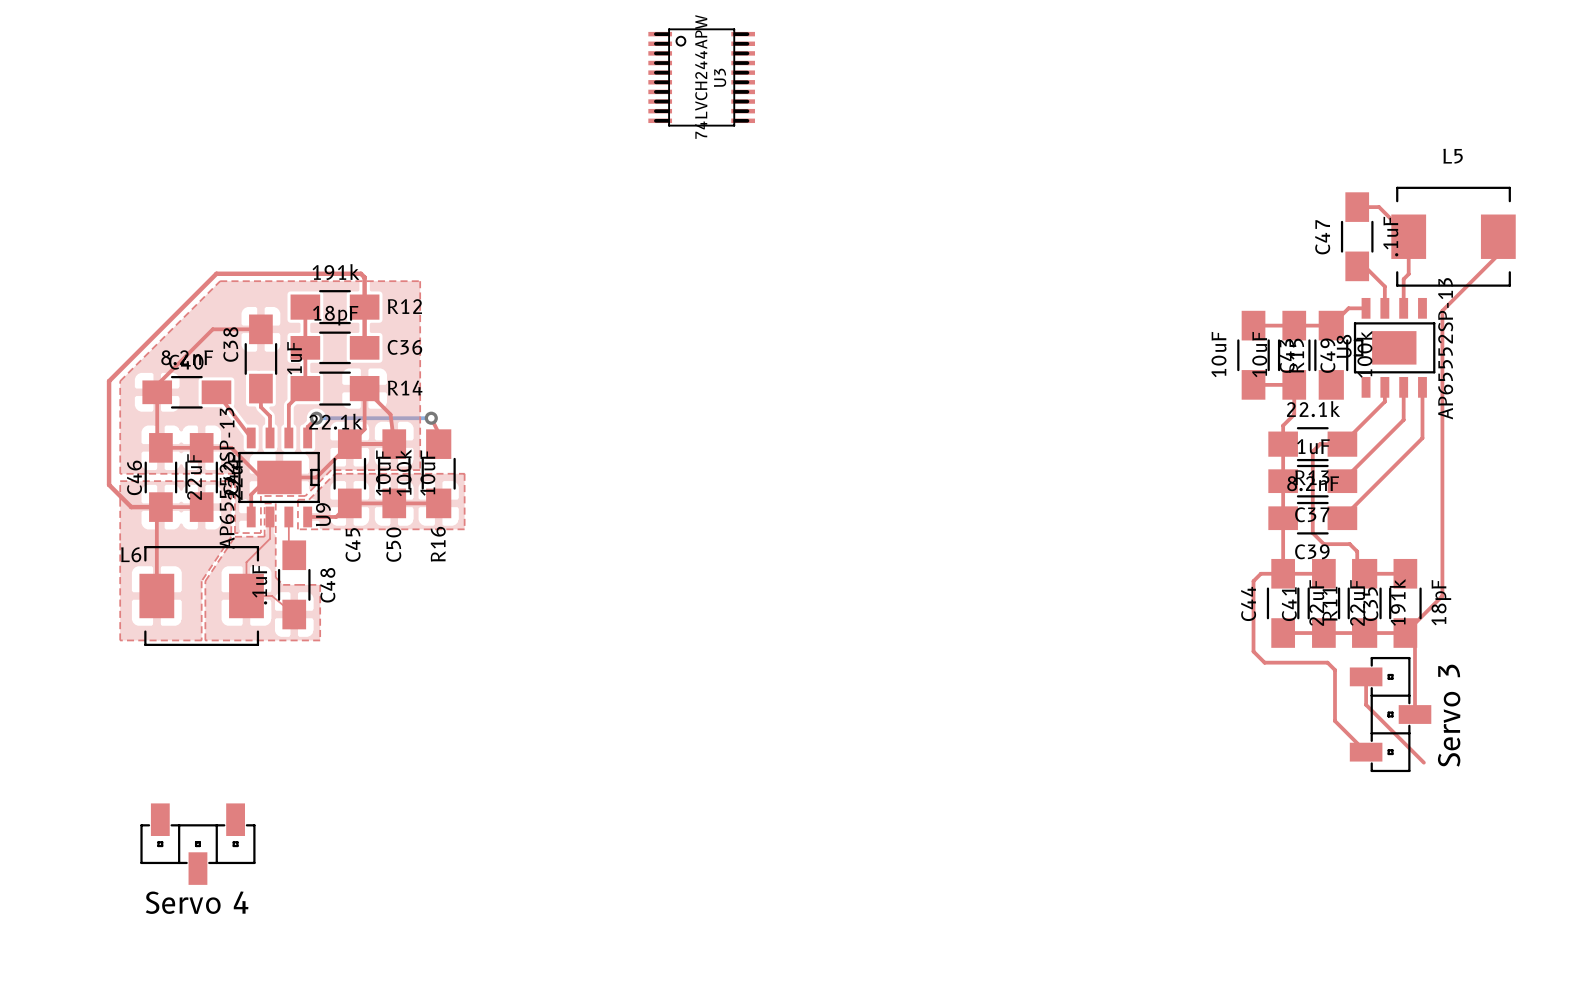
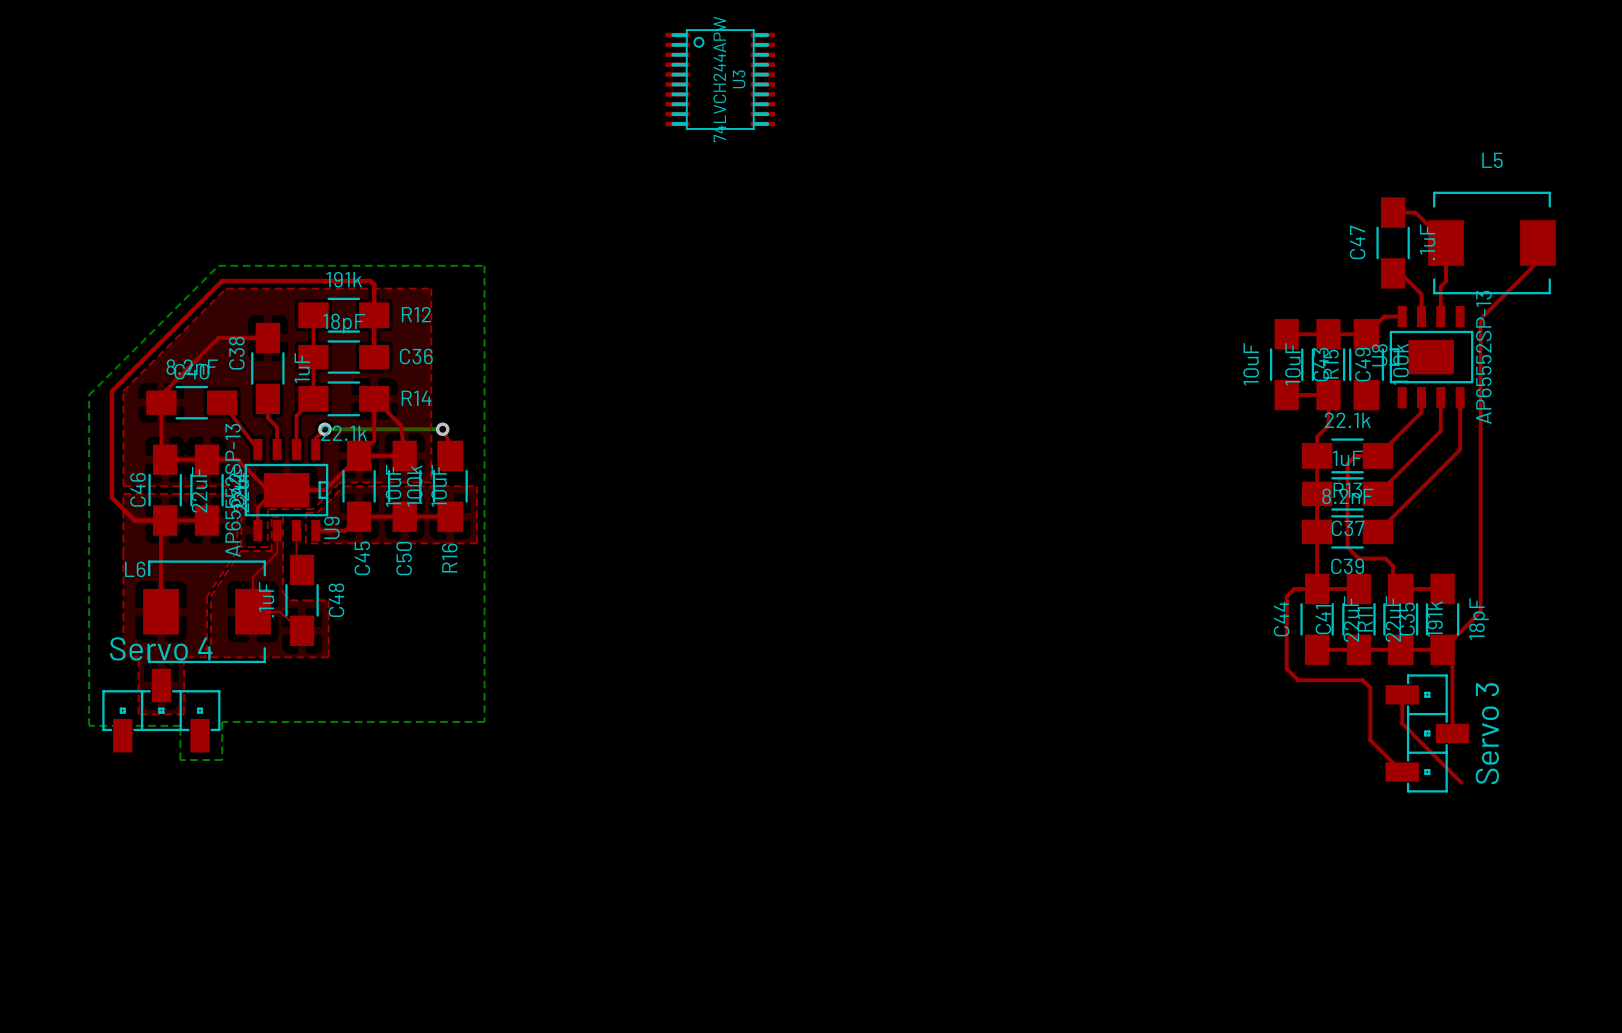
bottom zone outline: none -> (218, 265) (484, 265) (484, 722) (222, 722) (222, 760) (180, 760) (180, 725) (89, 725) (89, 395) (218, 265)
top zone outline: (134, 640) (179, 640) -> (138, 657) (138, 714) (184, 714) (184, 657)
part rotation: 0° (197, 844) -> 180° (161, 710)
part position: (197, 844) -> (161, 710)

